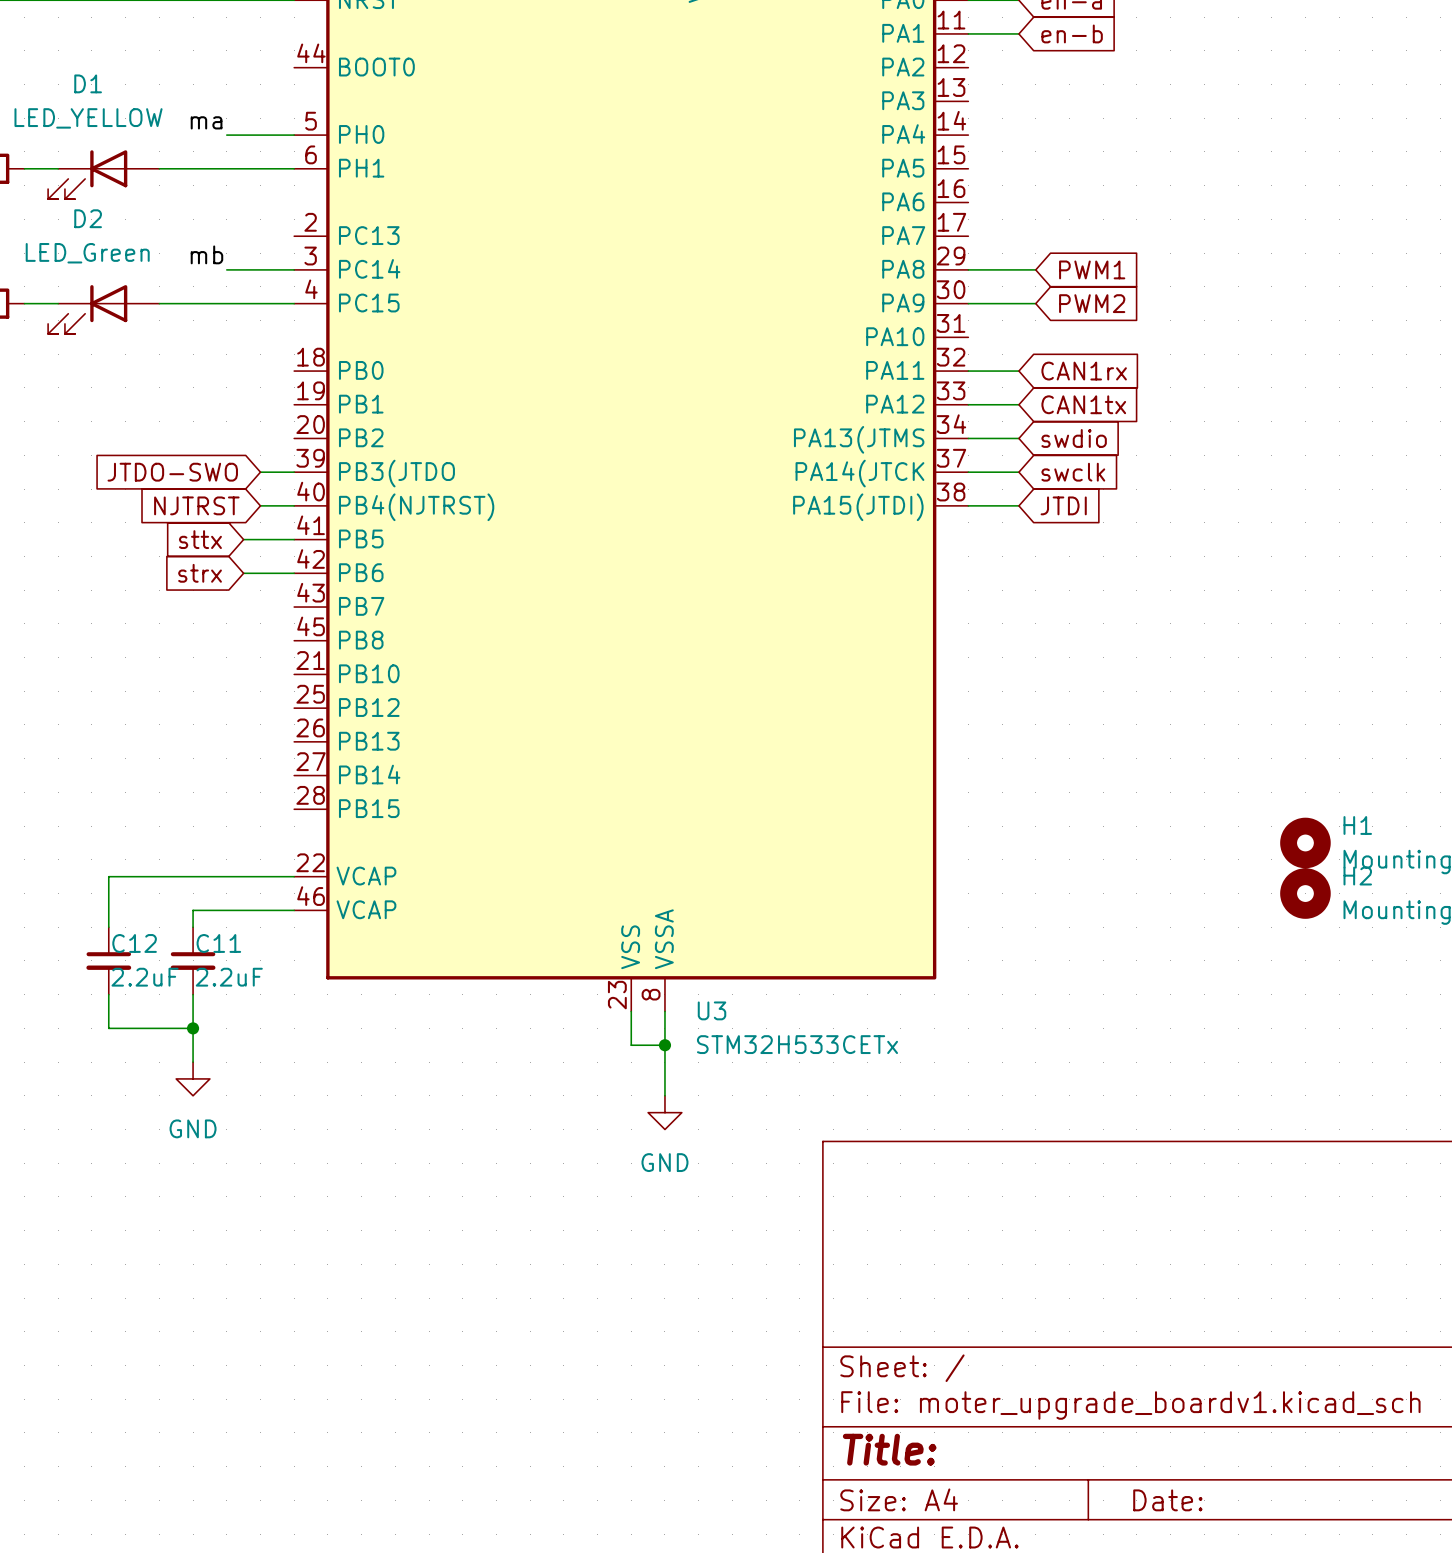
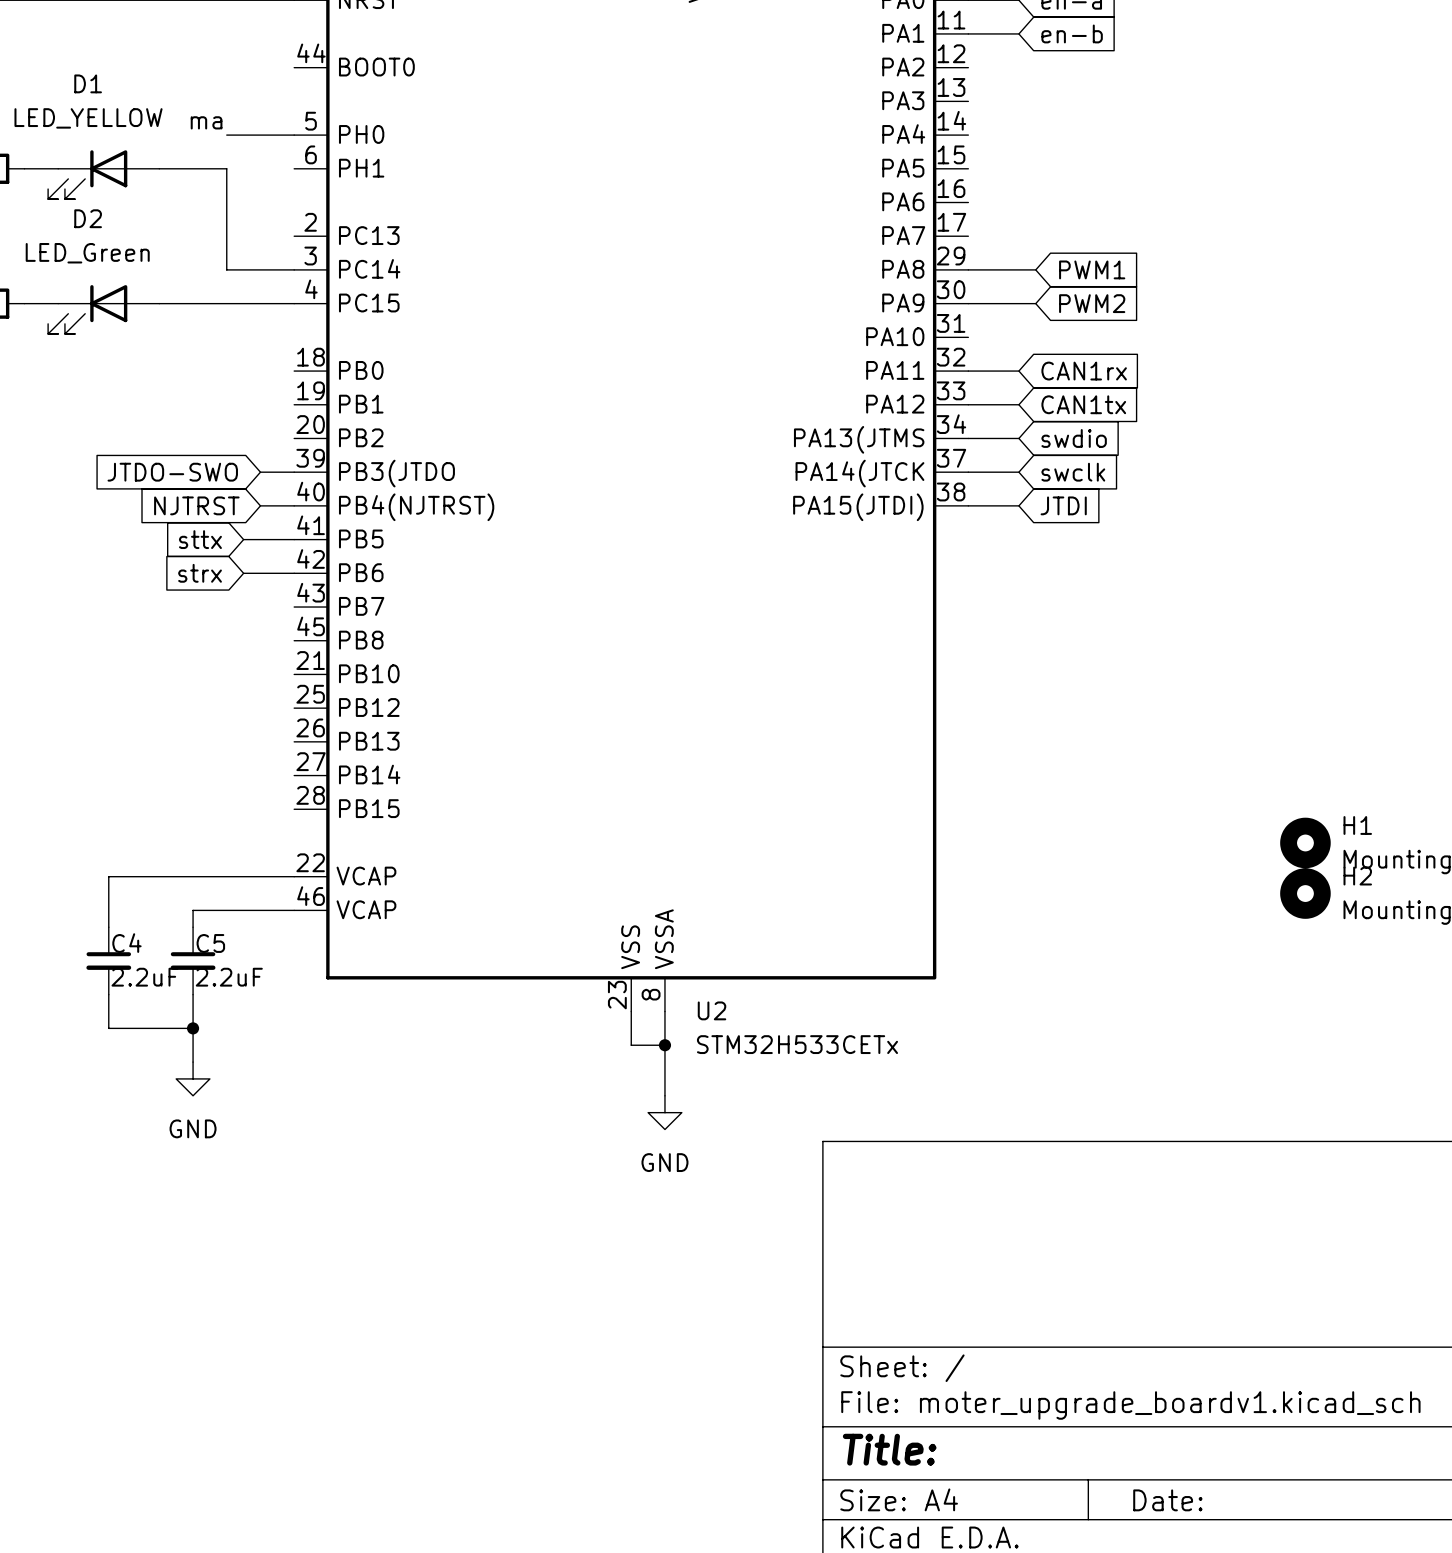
wire: (226, 168) (294, 168) -> (226, 168) (226, 269)
label: mb (206, 254) -> none
C12 name: C12 (134, 943) -> C4 (126, 943)
C11 name: C11 (218, 943) -> C5 (210, 943)
U3 name: U3 (712, 1010) -> U2 (712, 1010)

